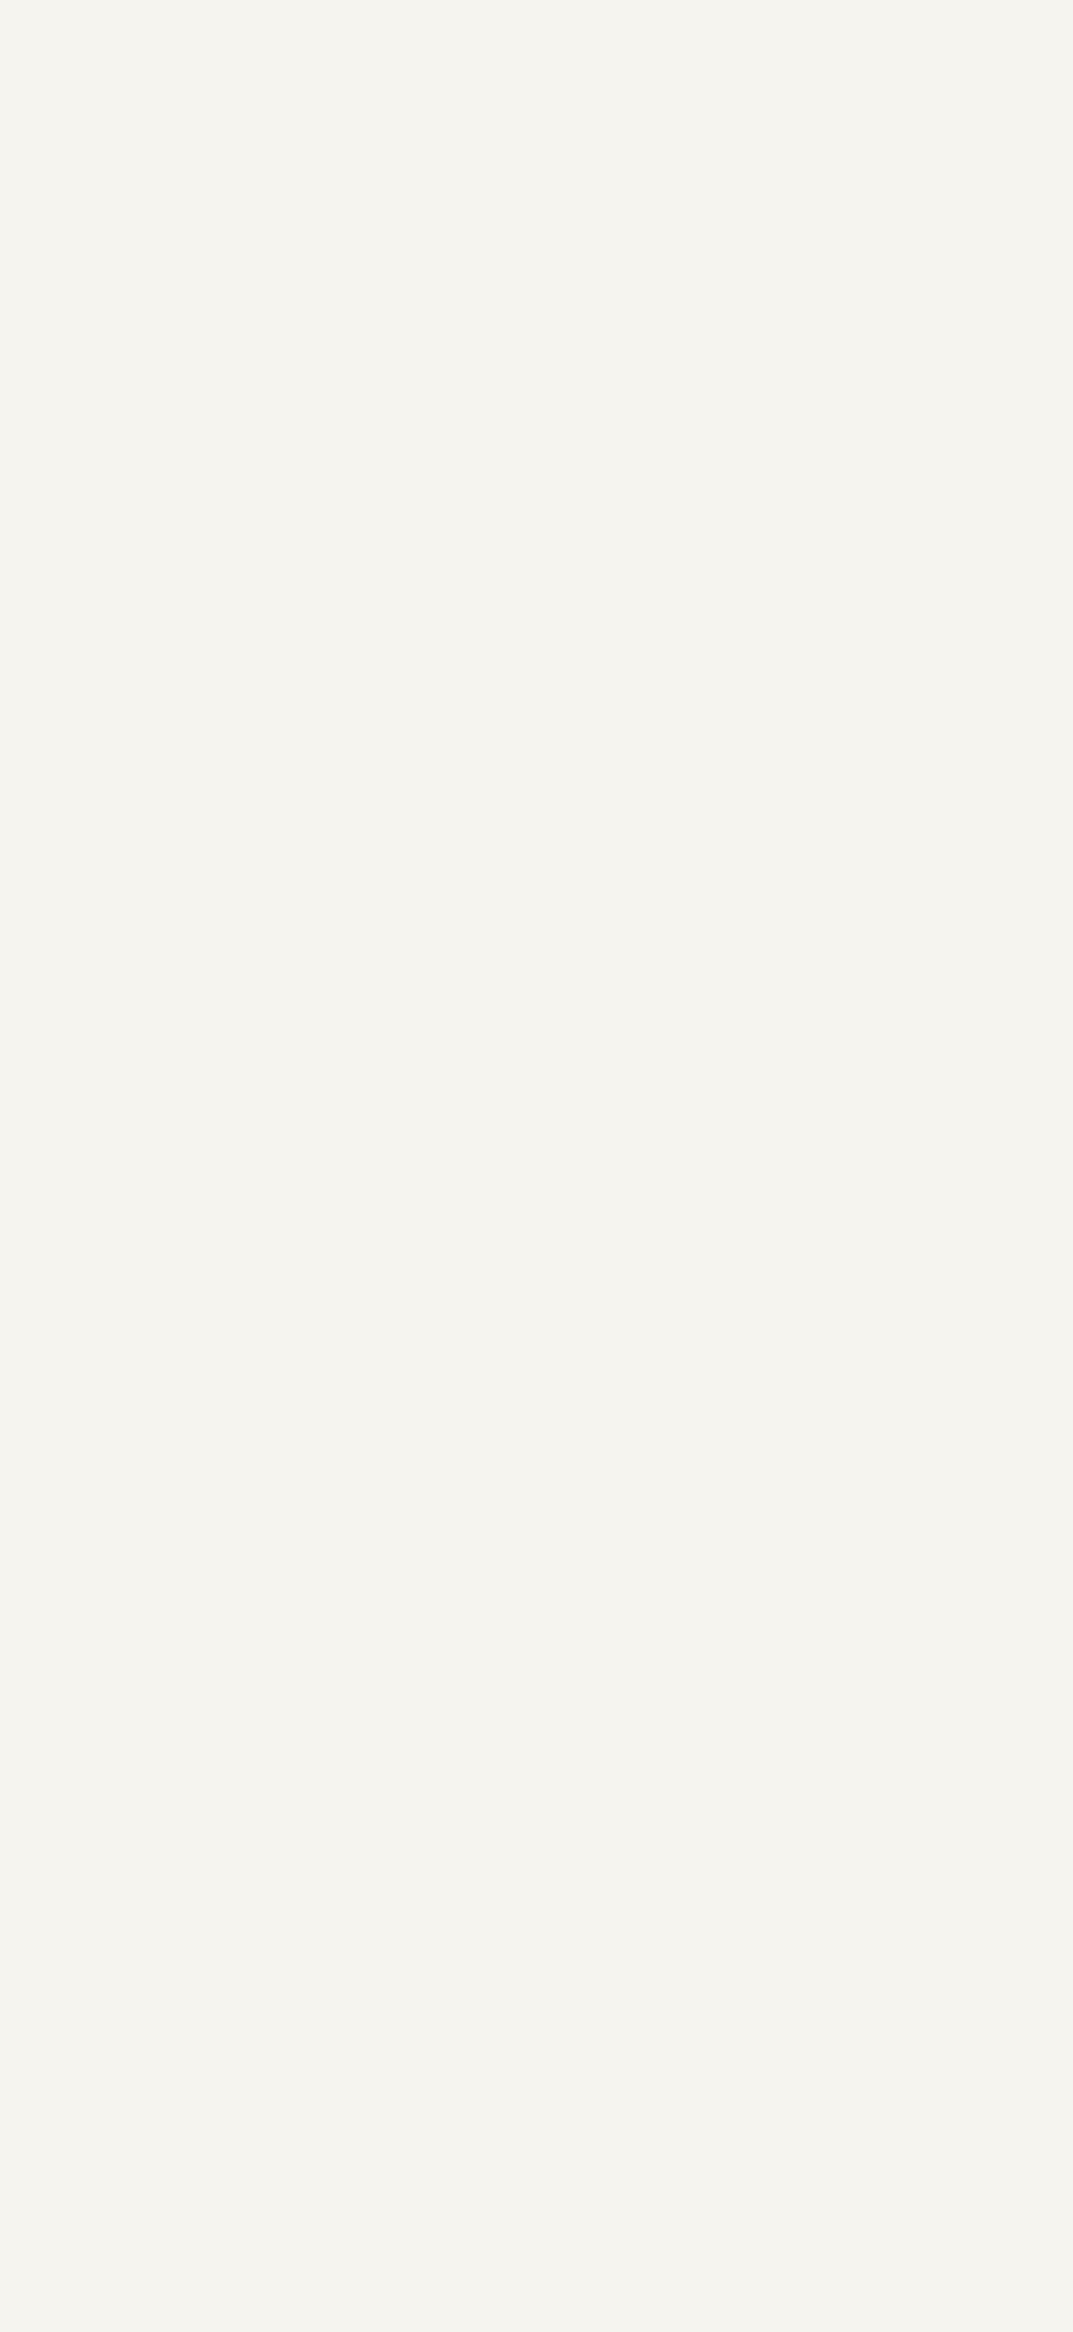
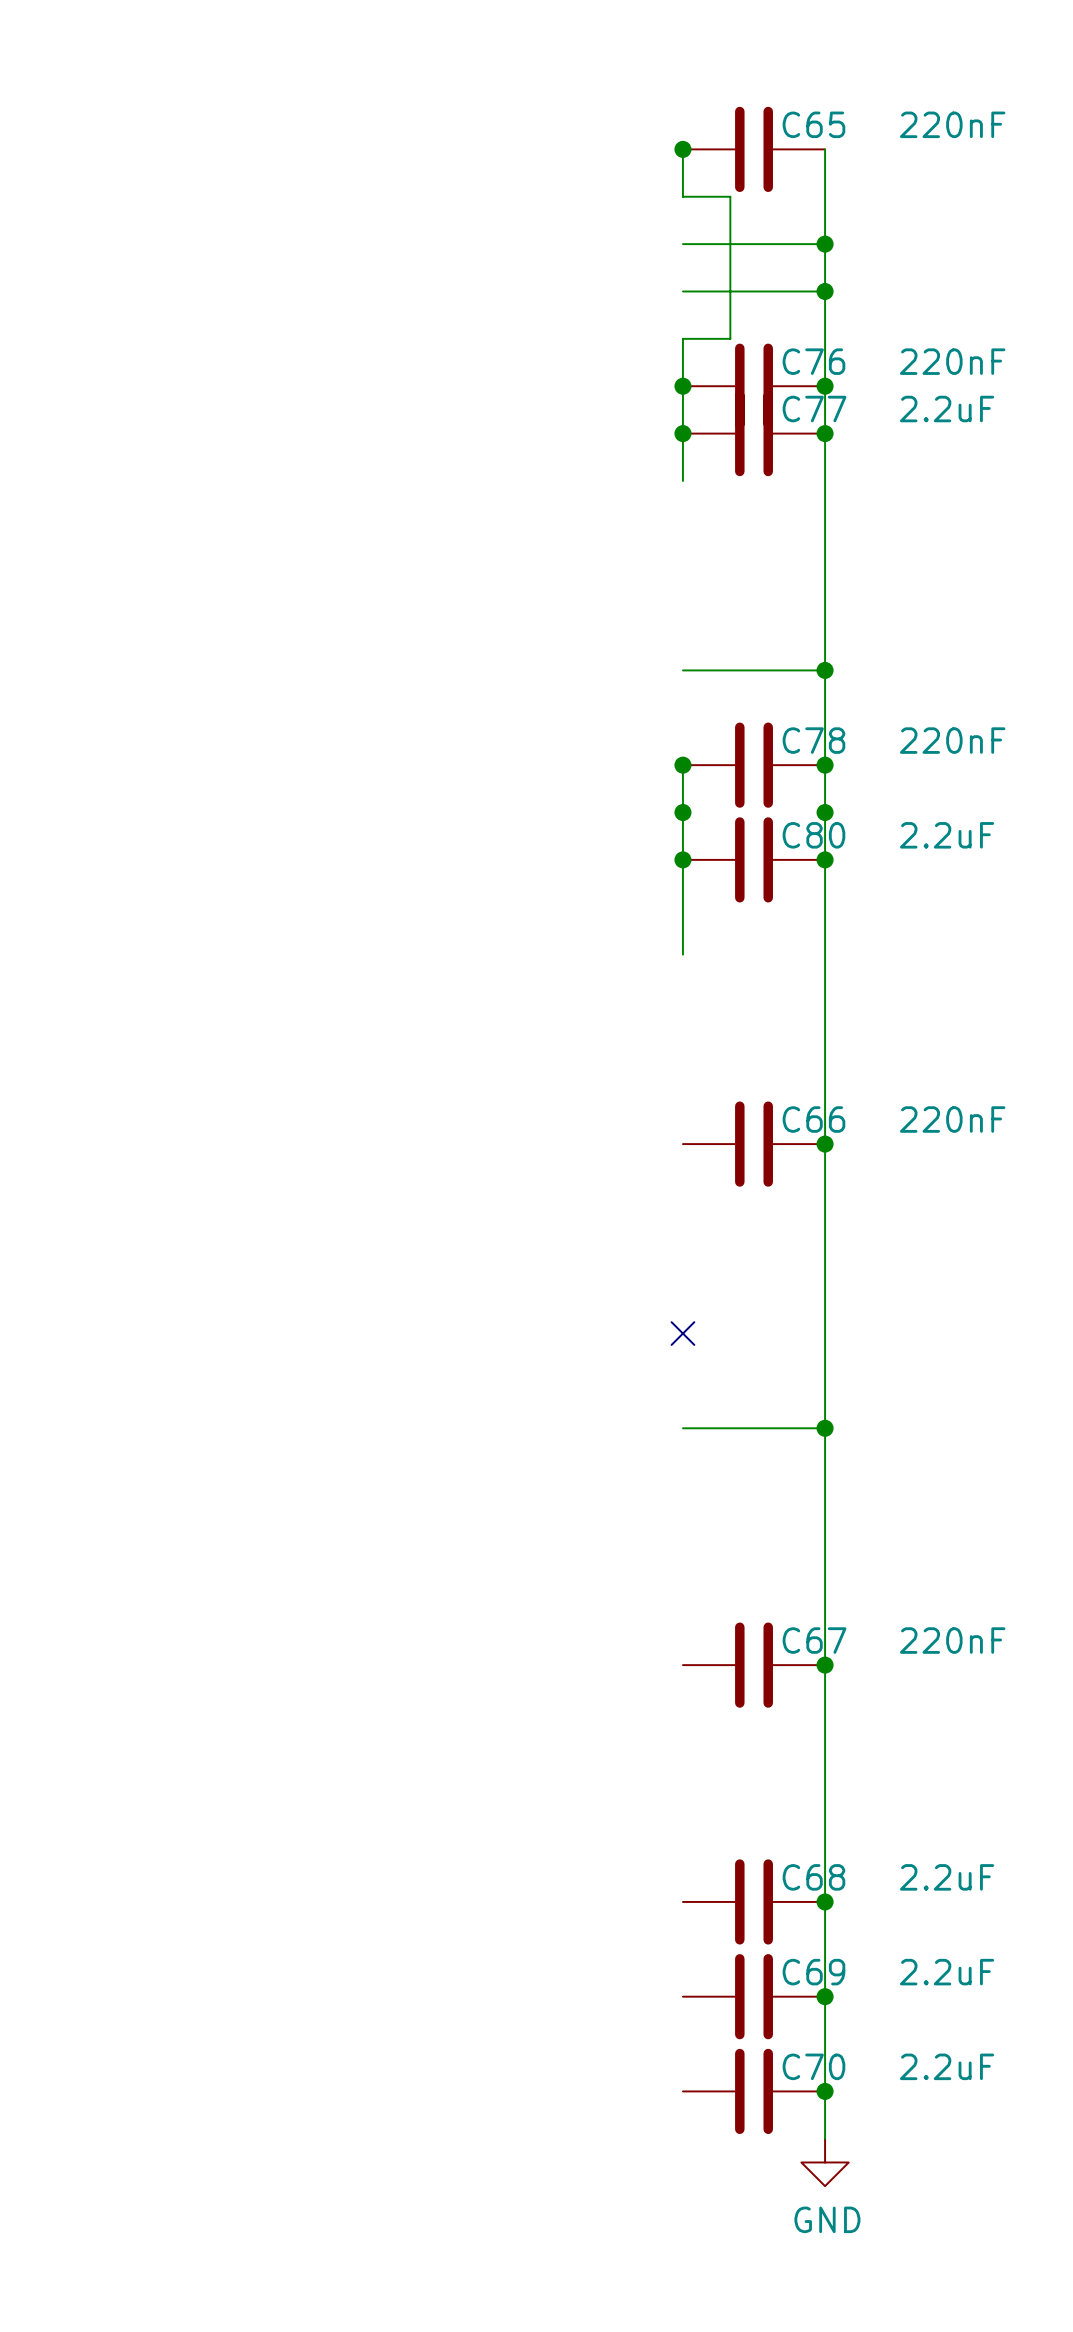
wire: none -> (682, 149) (682, 196) (730, 196) (730, 338) (682, 338) (682, 480)
junction: none -> (682, 149)
C65: none -> 220nF (754, 149)
wire: none -> (825, 149) (825, 2138)
wire: none -> (682, 244) (825, 244)
junction: none -> (825, 244)
wire: none -> (682, 291) (825, 291)
junction: none -> (825, 291)
junction: none -> (682, 386)
C76: none -> 220nF (754, 386)
junction: none -> (825, 386)
junction: none -> (682, 433)
C77: none -> 2.2uF (754, 433)
junction: none -> (825, 433)
wire: none -> (682, 670) (825, 670)
junction: none -> (825, 670)
wire: none -> (682, 765) (682, 954)
junction: none -> (682, 765)
C78: none -> 220nF (754, 765)
junction: none -> (825, 765)
junction: none -> (682, 812)
junction: none -> (825, 812)
junction: none -> (682, 859)
C80: none -> 2.2uF (754, 859)
junction: none -> (825, 859)
C66: none -> 220nF (754, 1144)
junction: none -> (825, 1144)
no-connect mark: none -> (682, 1333)
wire: none -> (682, 1428) (825, 1428)
junction: none -> (825, 1428)
C67: none -> 220nF (754, 1665)
junction: none -> (825, 1665)
C68: none -> 2.2uF (754, 1901)
junction: none -> (825, 1901)
C69: none -> 2.2uF (754, 1996)
junction: none -> (825, 1996)
C70: none -> 2.2uF (754, 2091)
junction: none -> (825, 2091)
power symbol: none -> GND (825, 2162)

